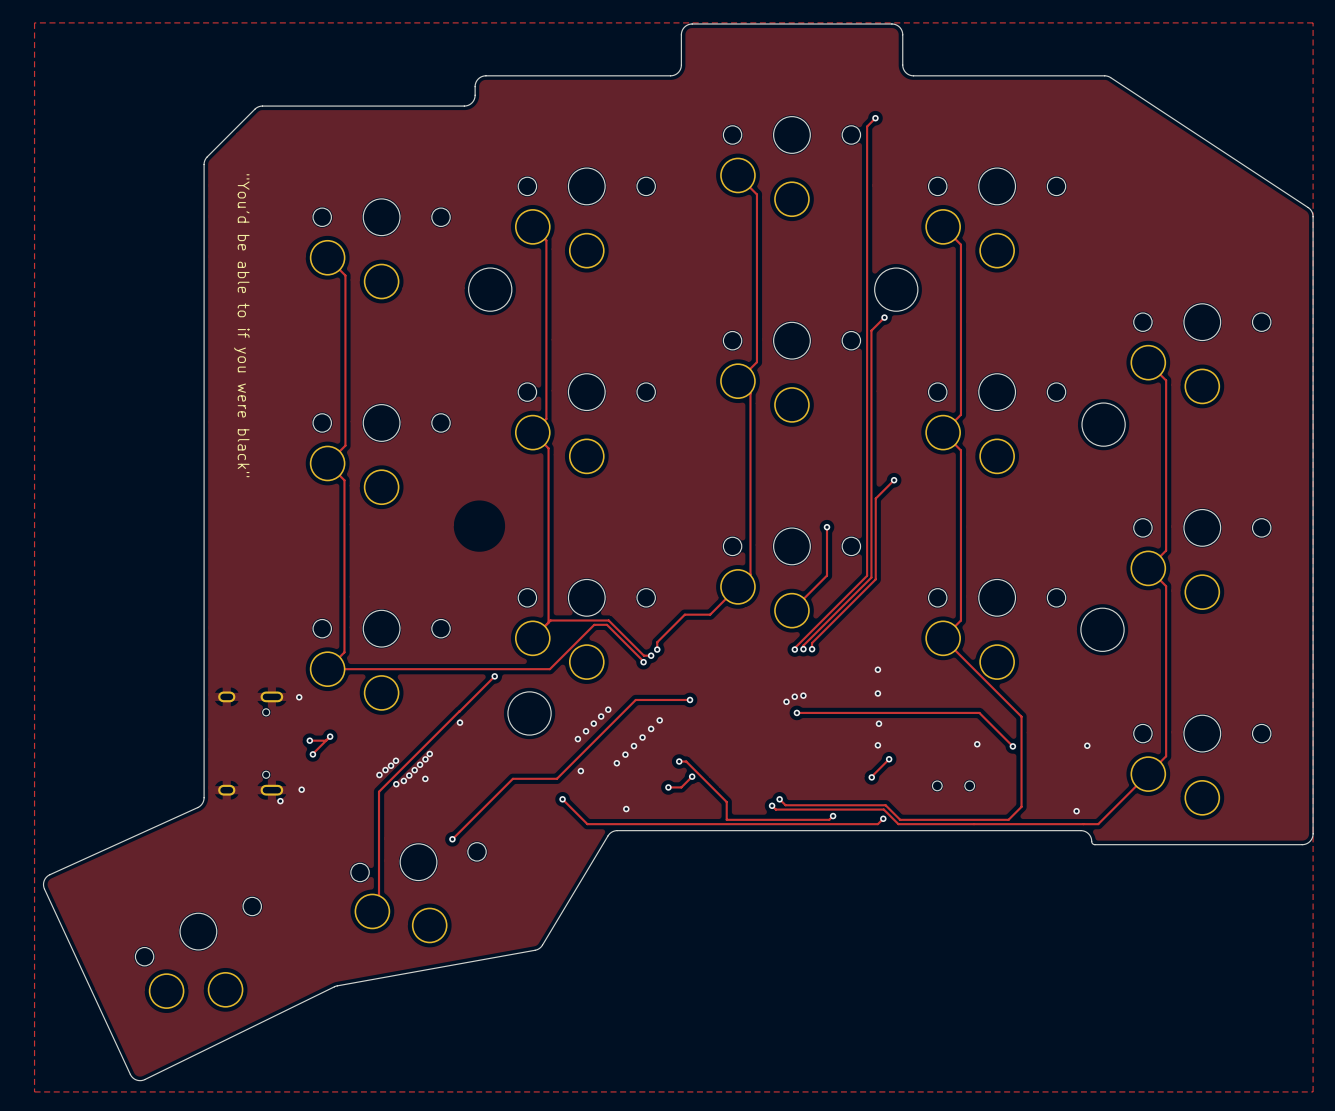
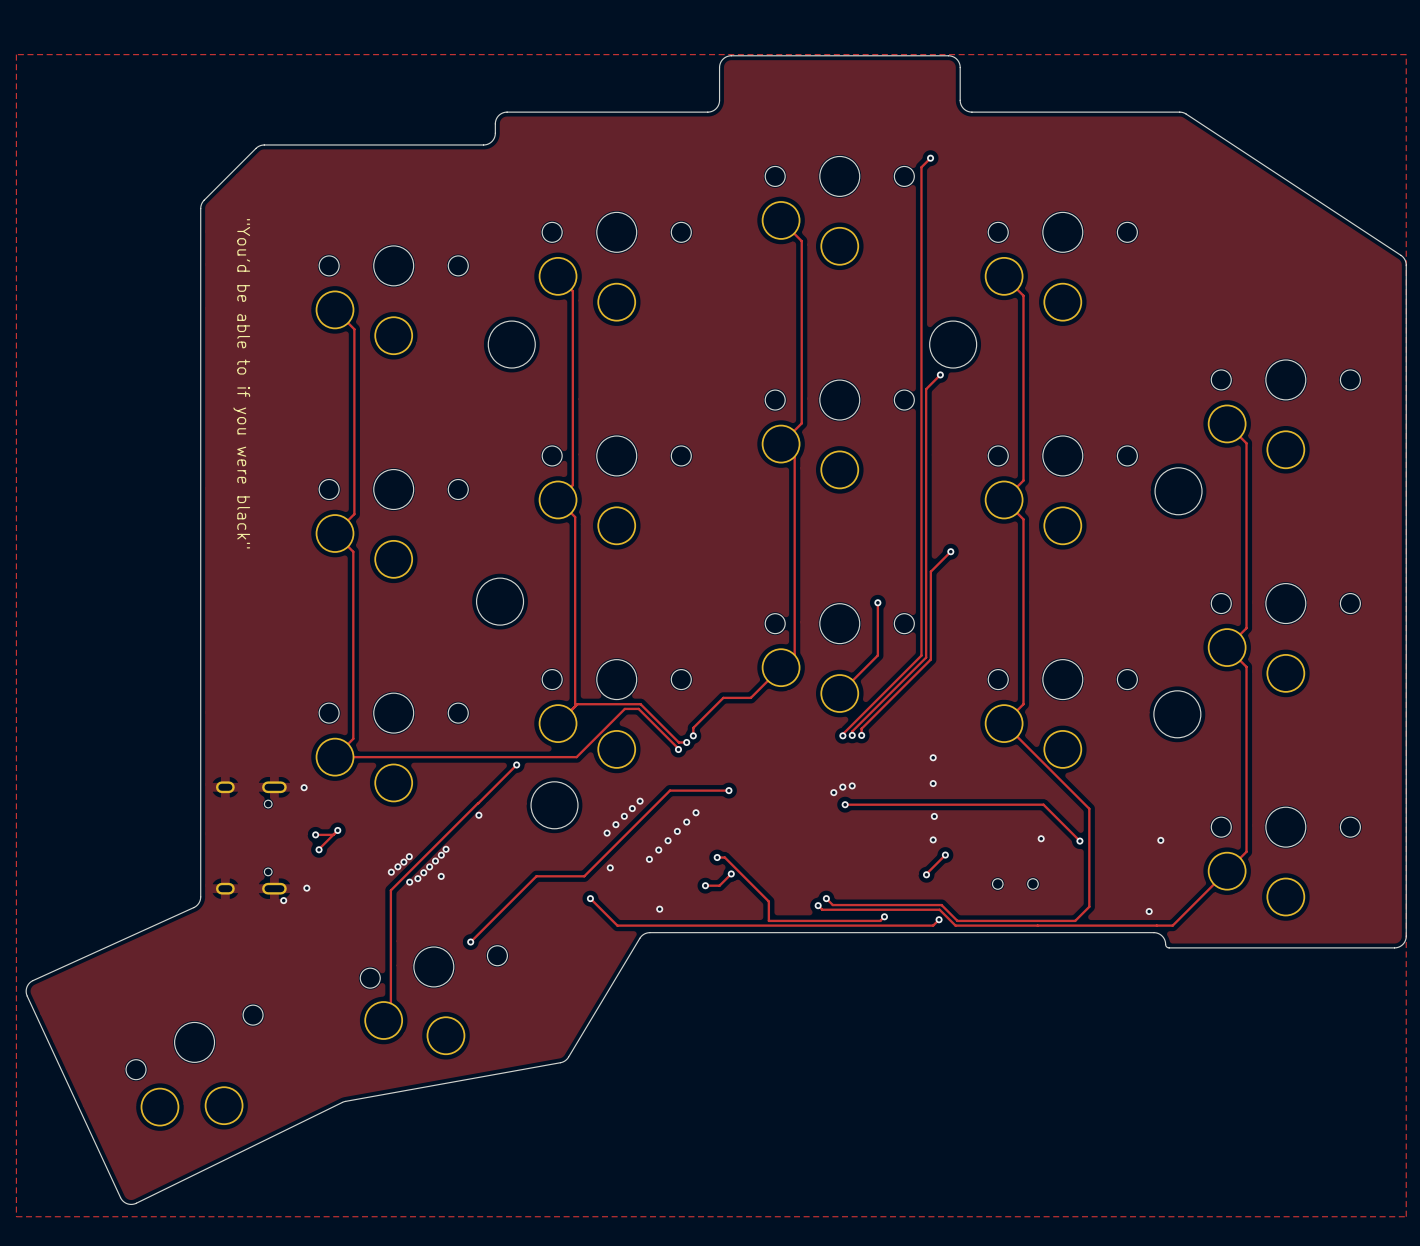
round board edge: none -> [476, 577, 524, 626]

